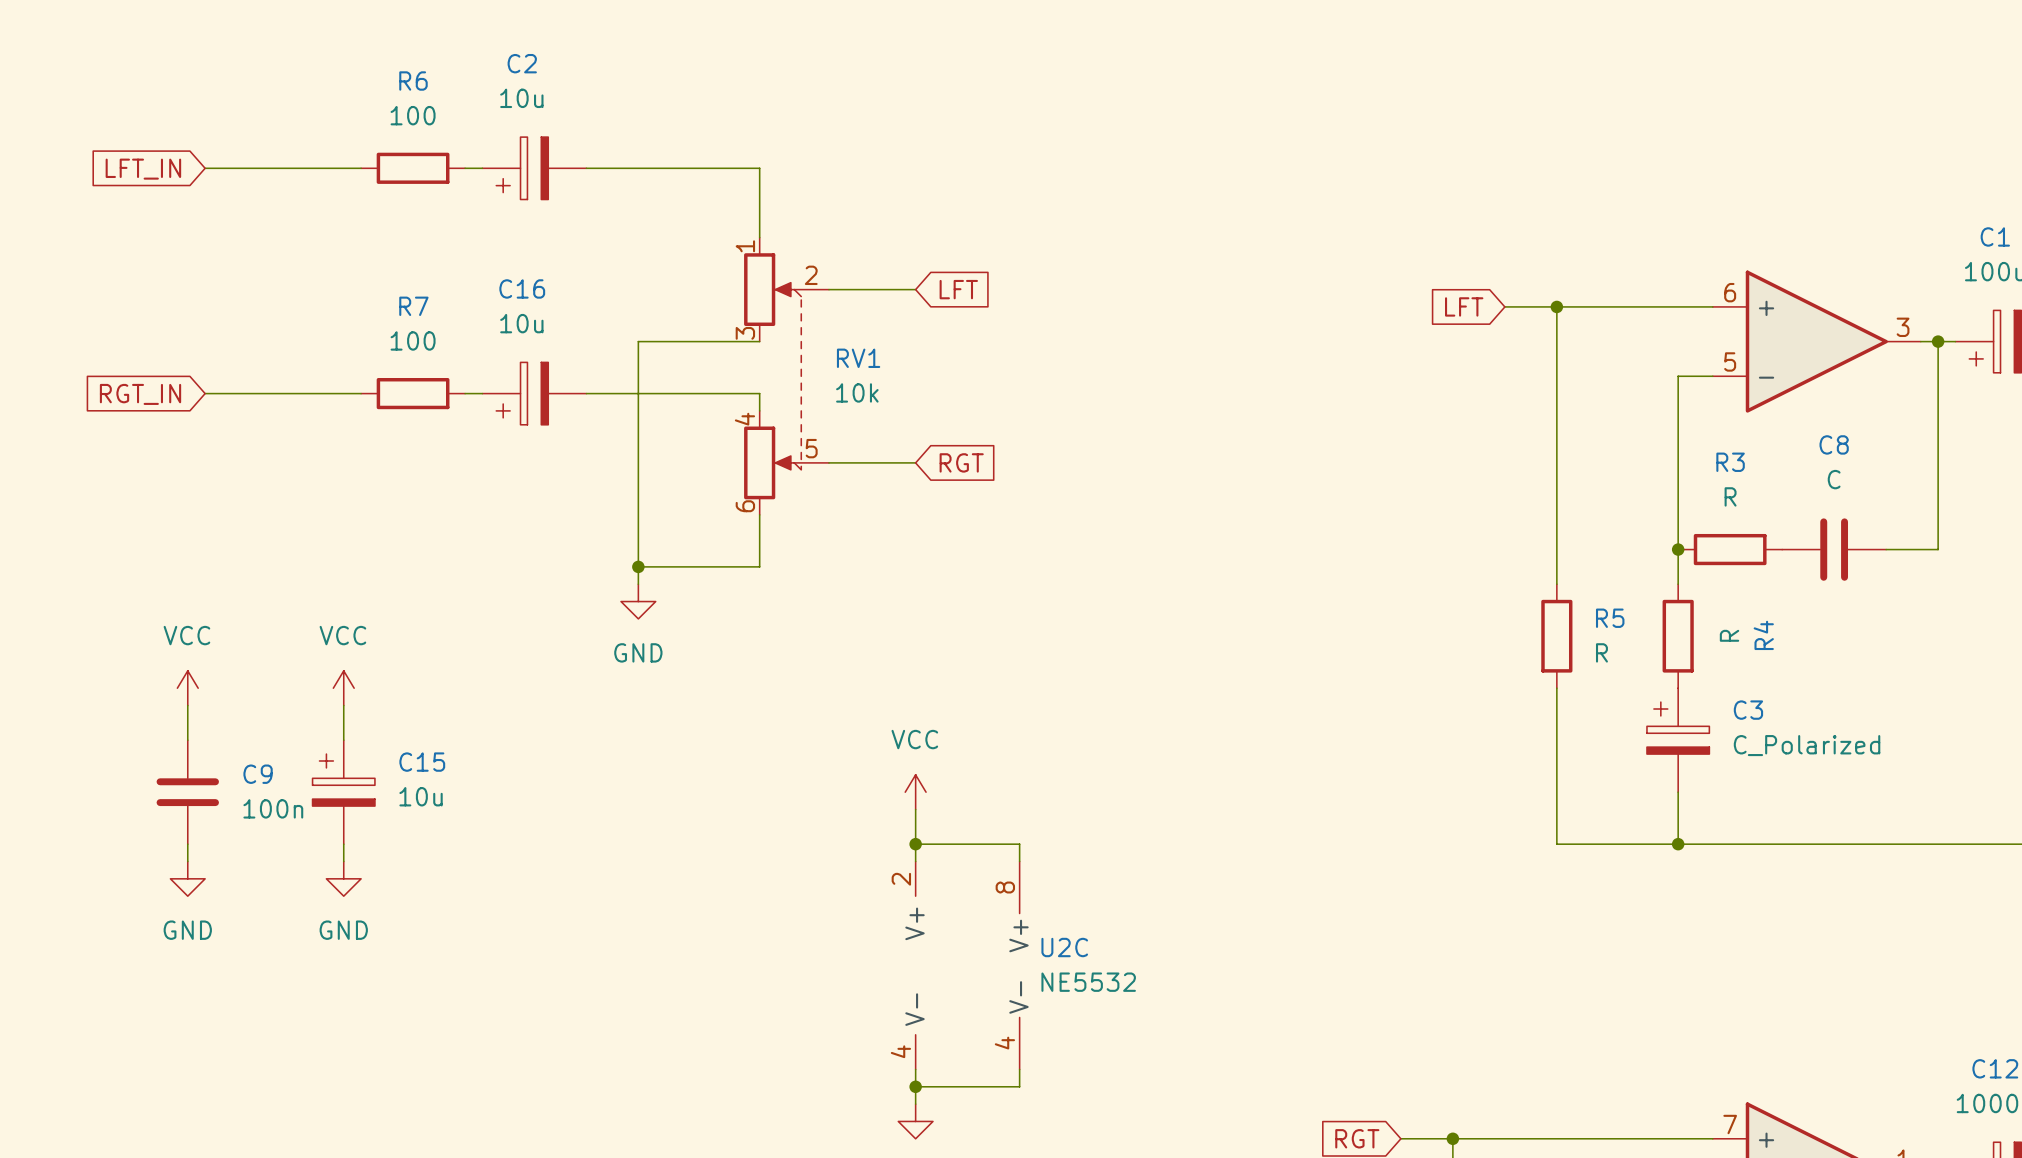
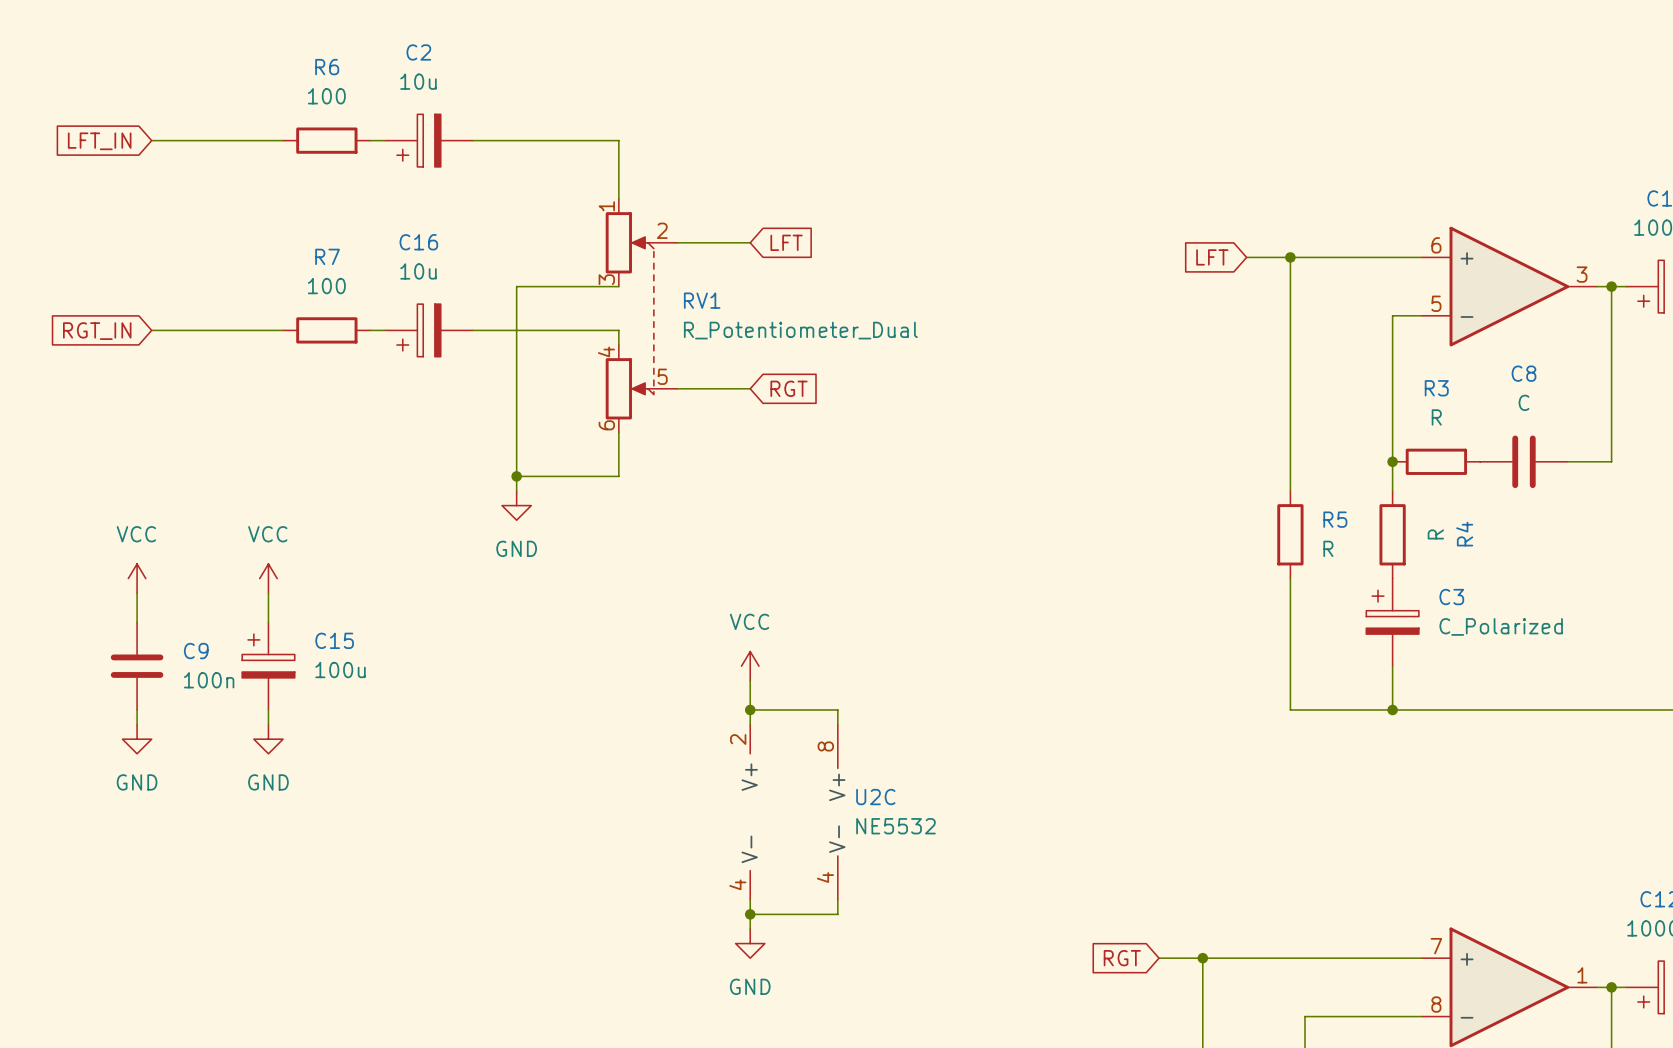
RV1 value: 10k (857, 392) -> R_Potentiometer_Dual (800, 330)
C15 value: 10u (421, 796) -> 100u (340, 670)

